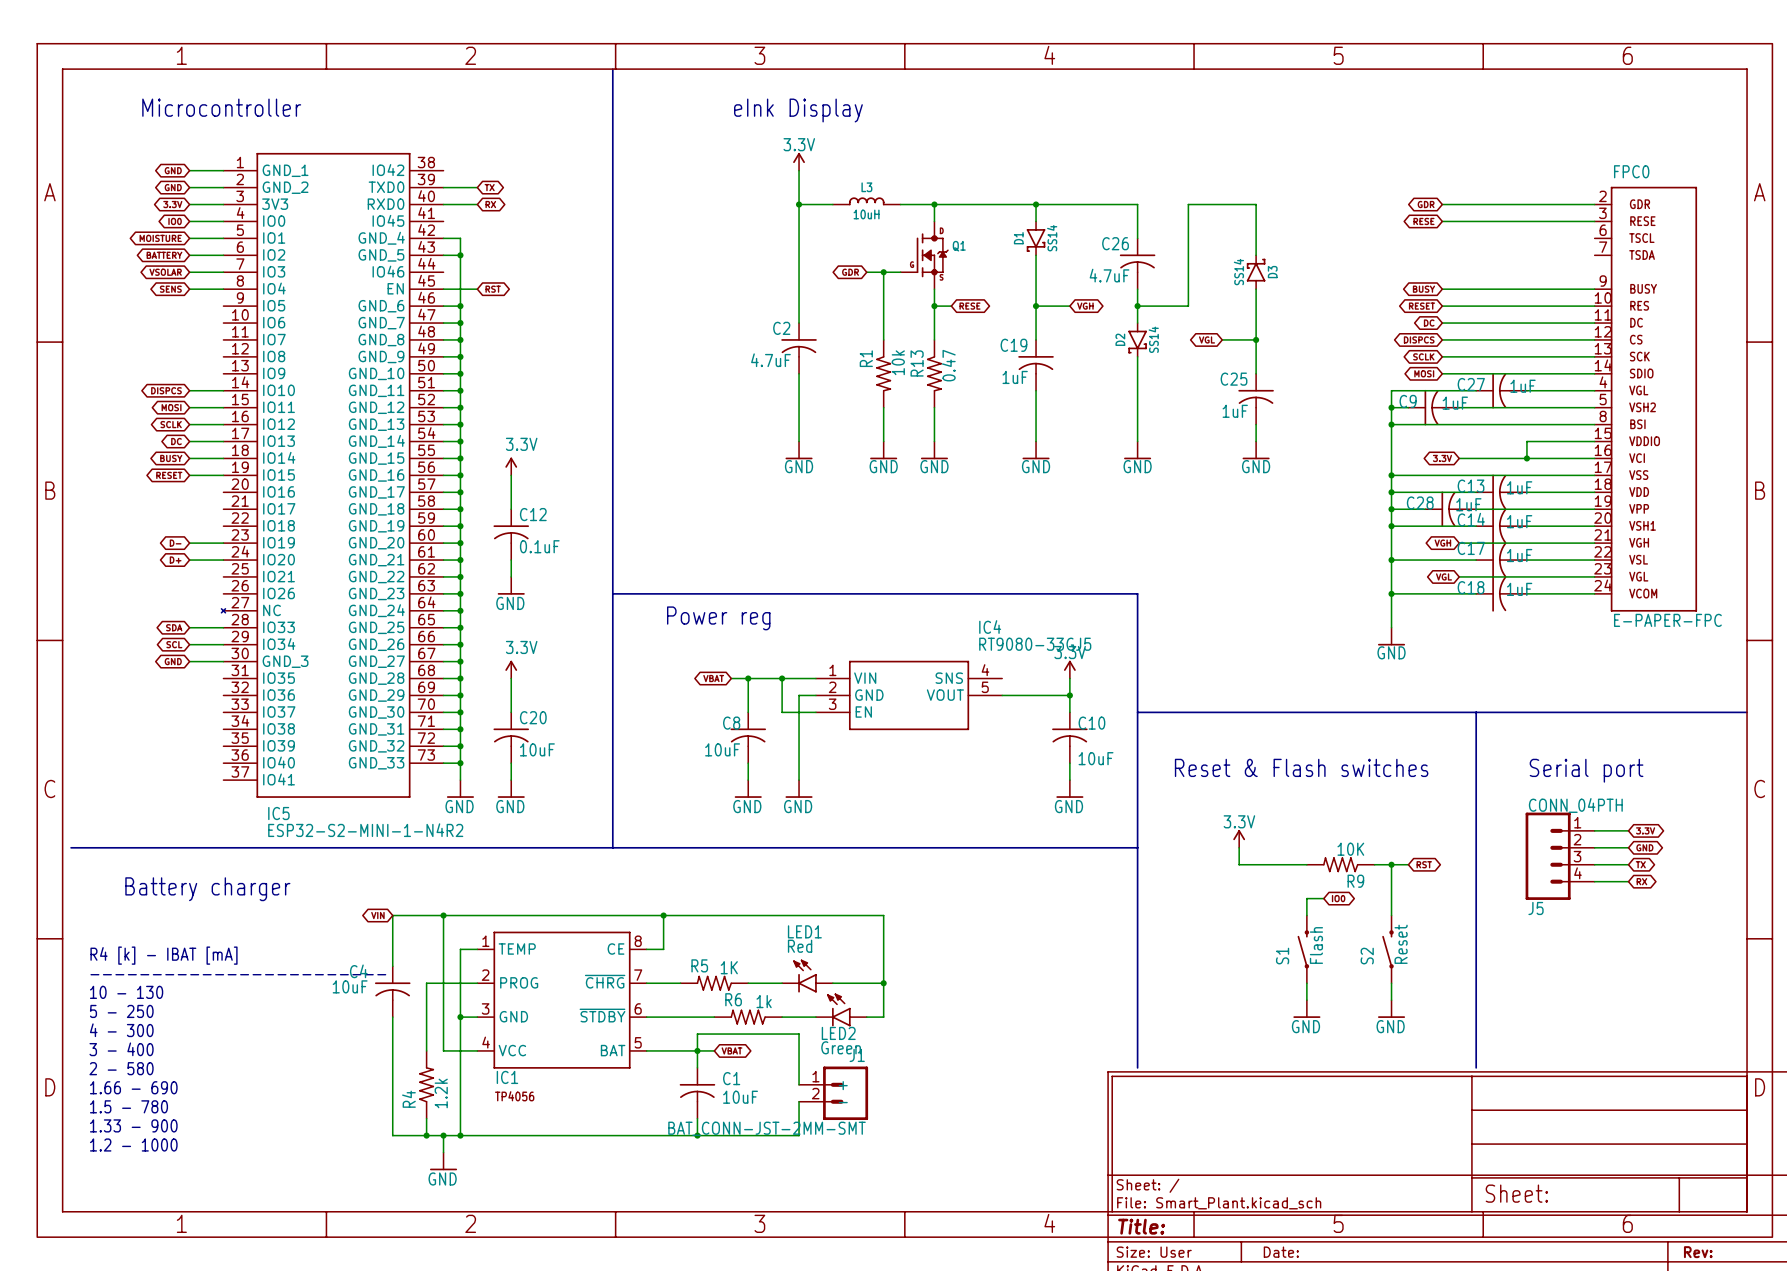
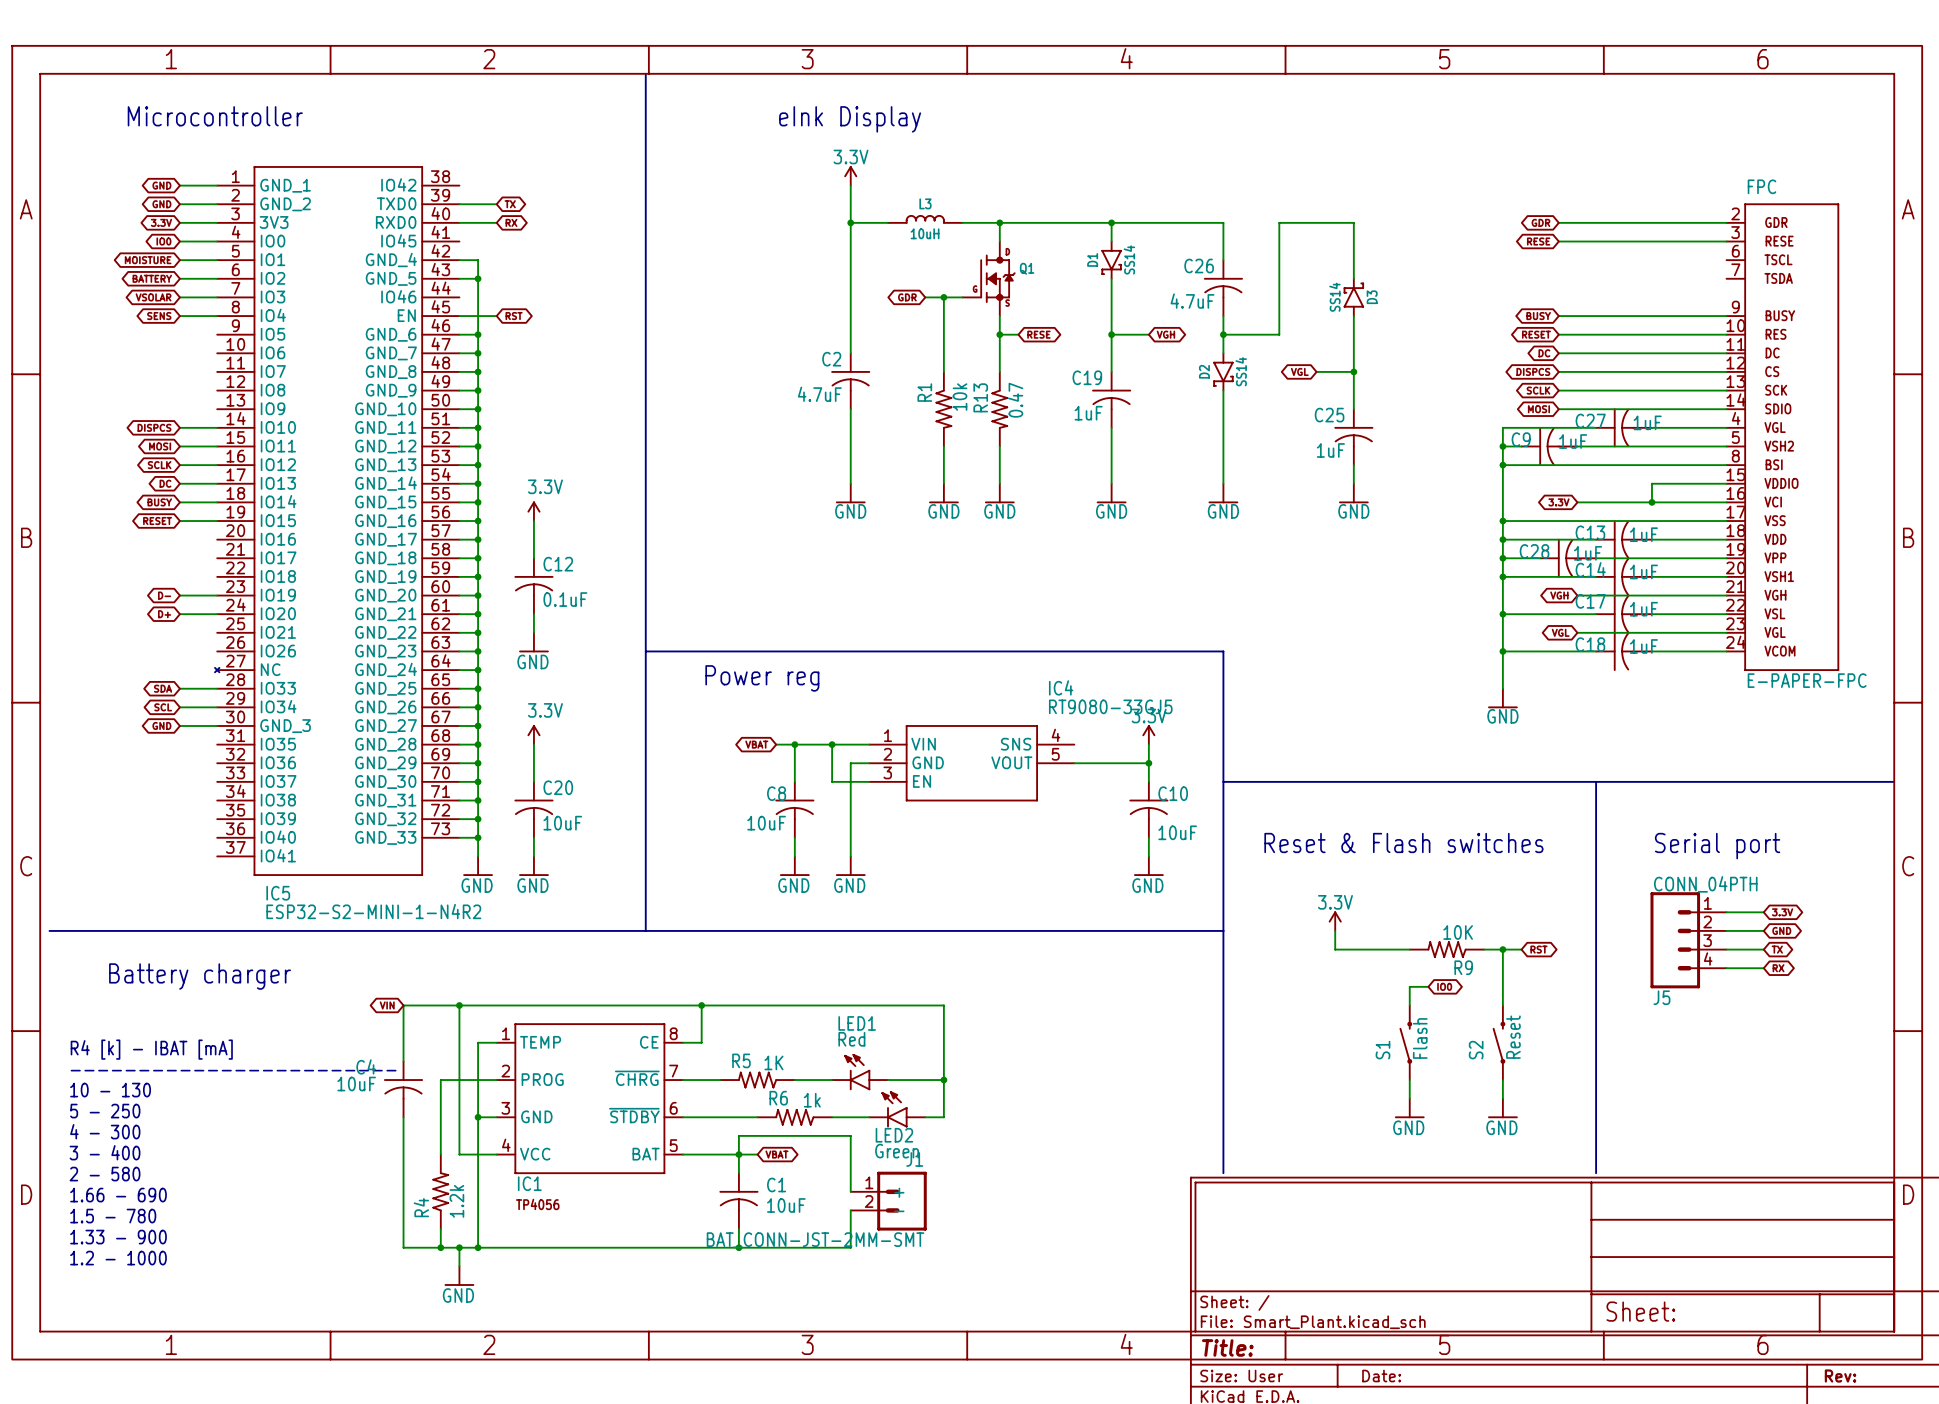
FPC0 name: FPC0 (1631, 171) -> FPC (1761, 186)

